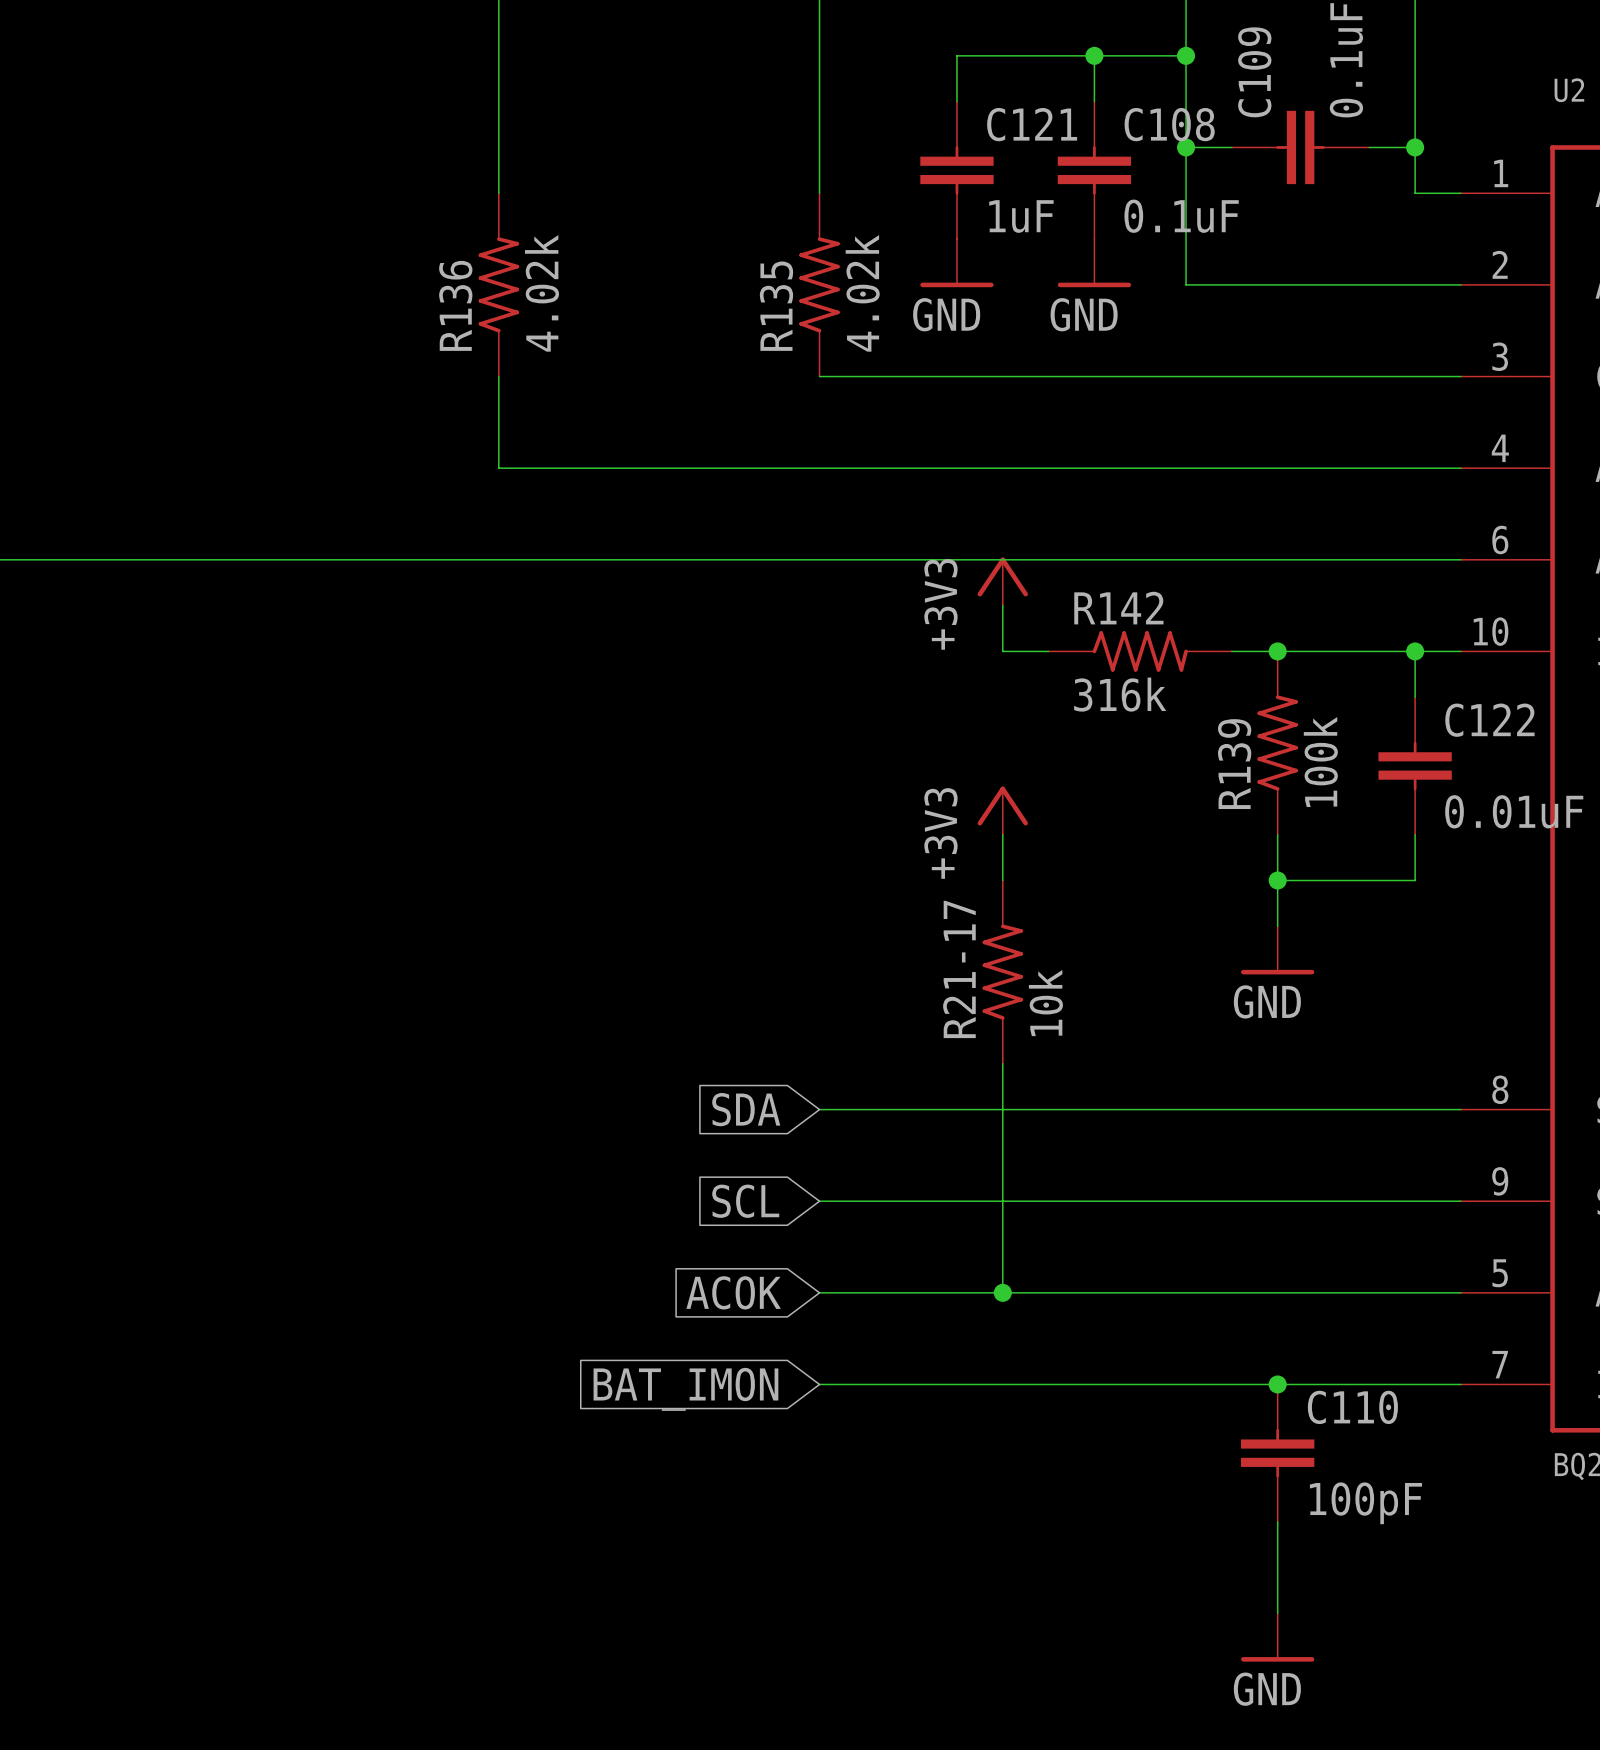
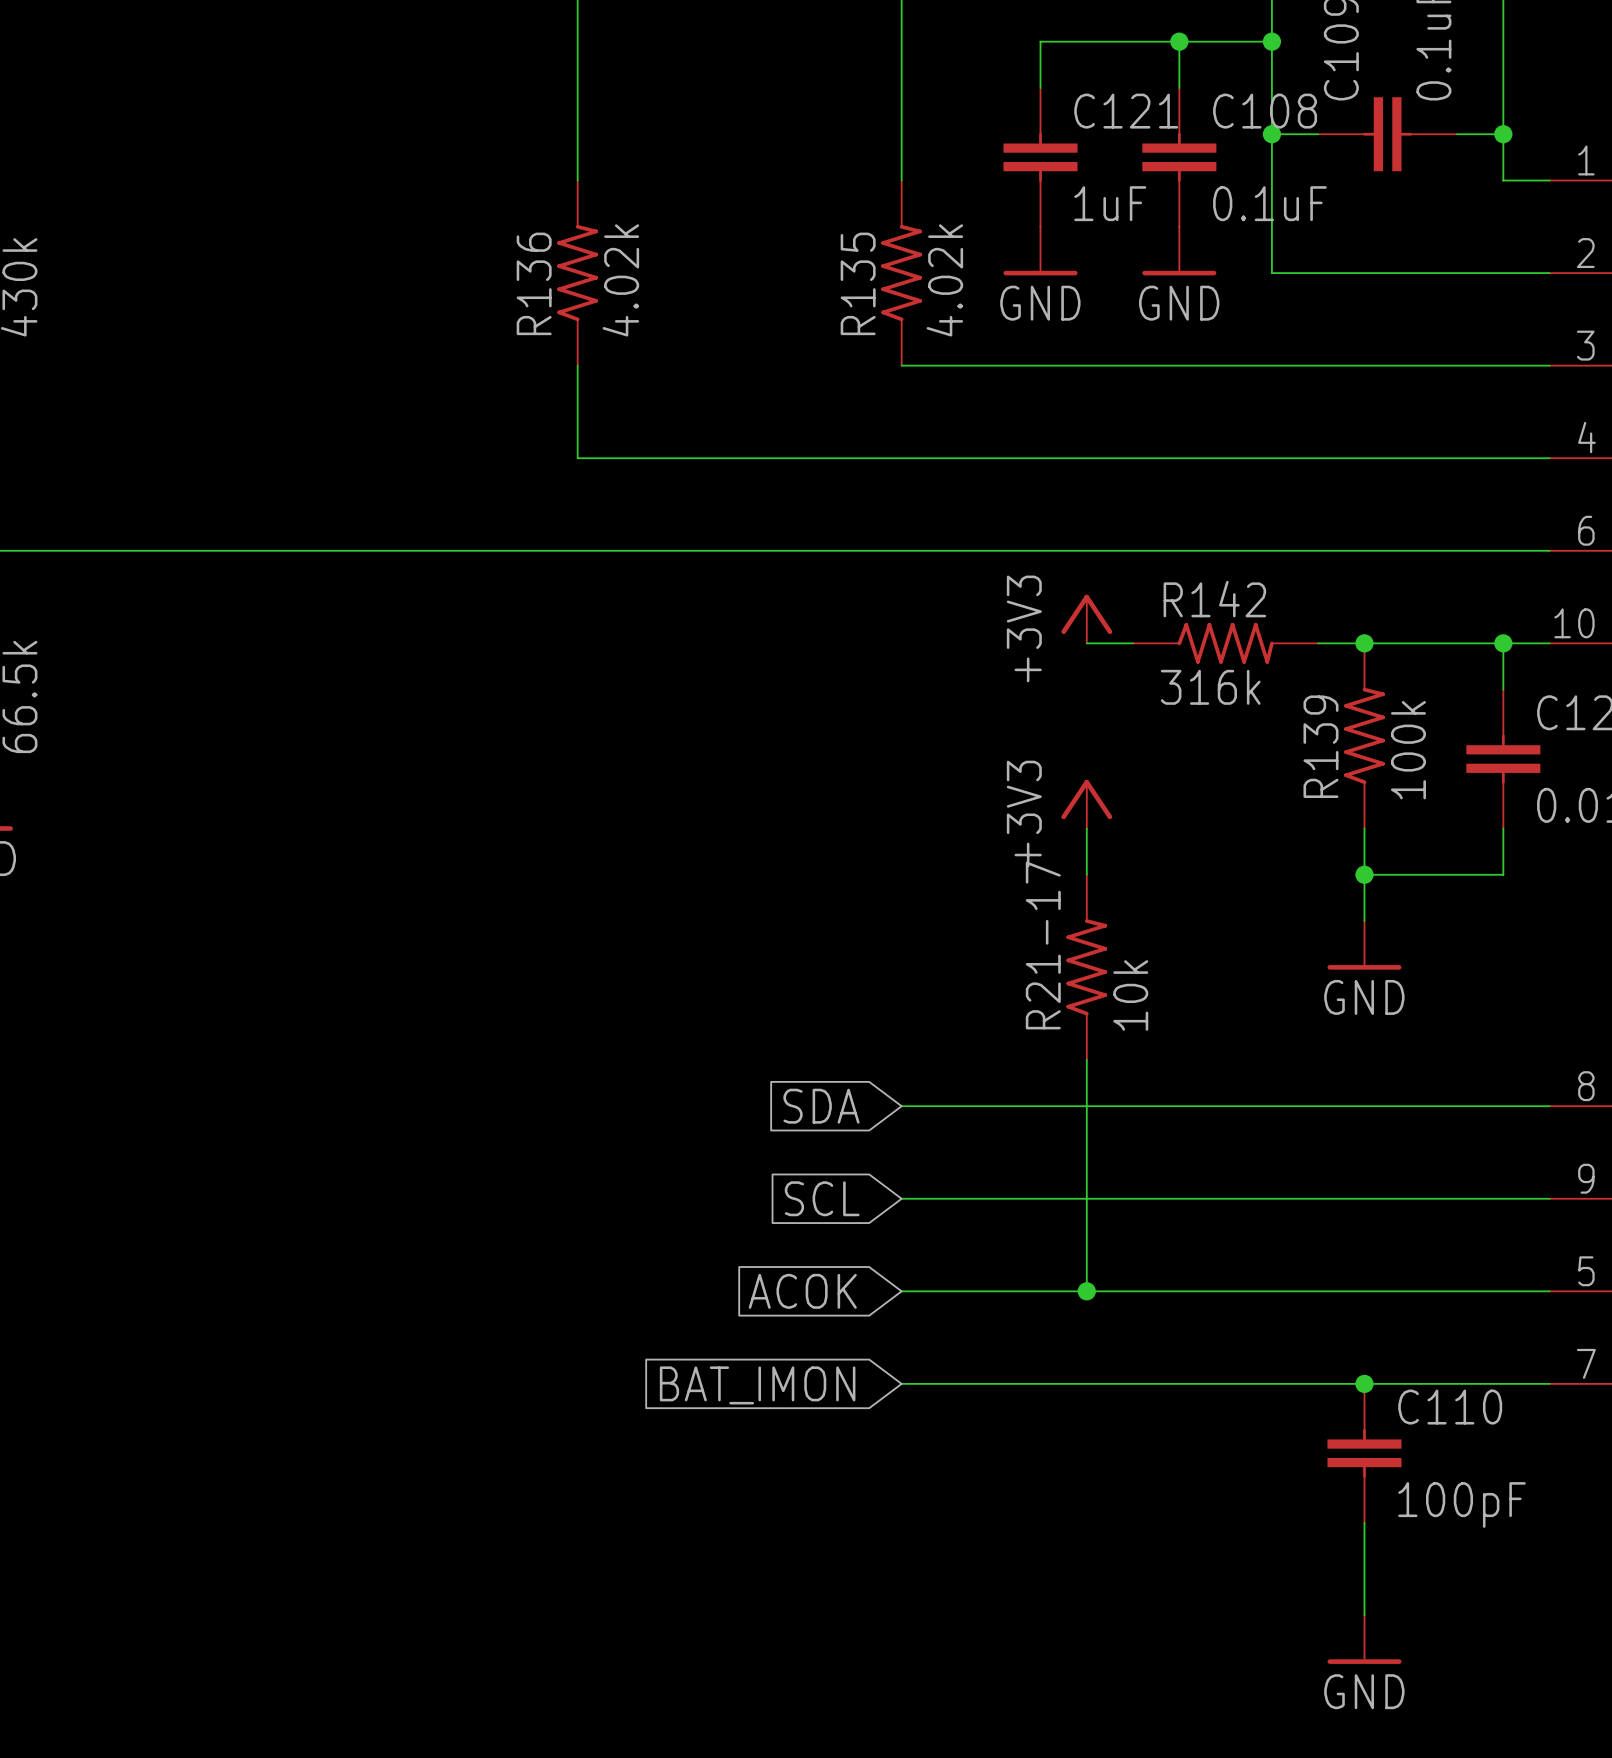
power symbol position: +3V3 (1002, 581) -> +3V3 (1086, 619)

